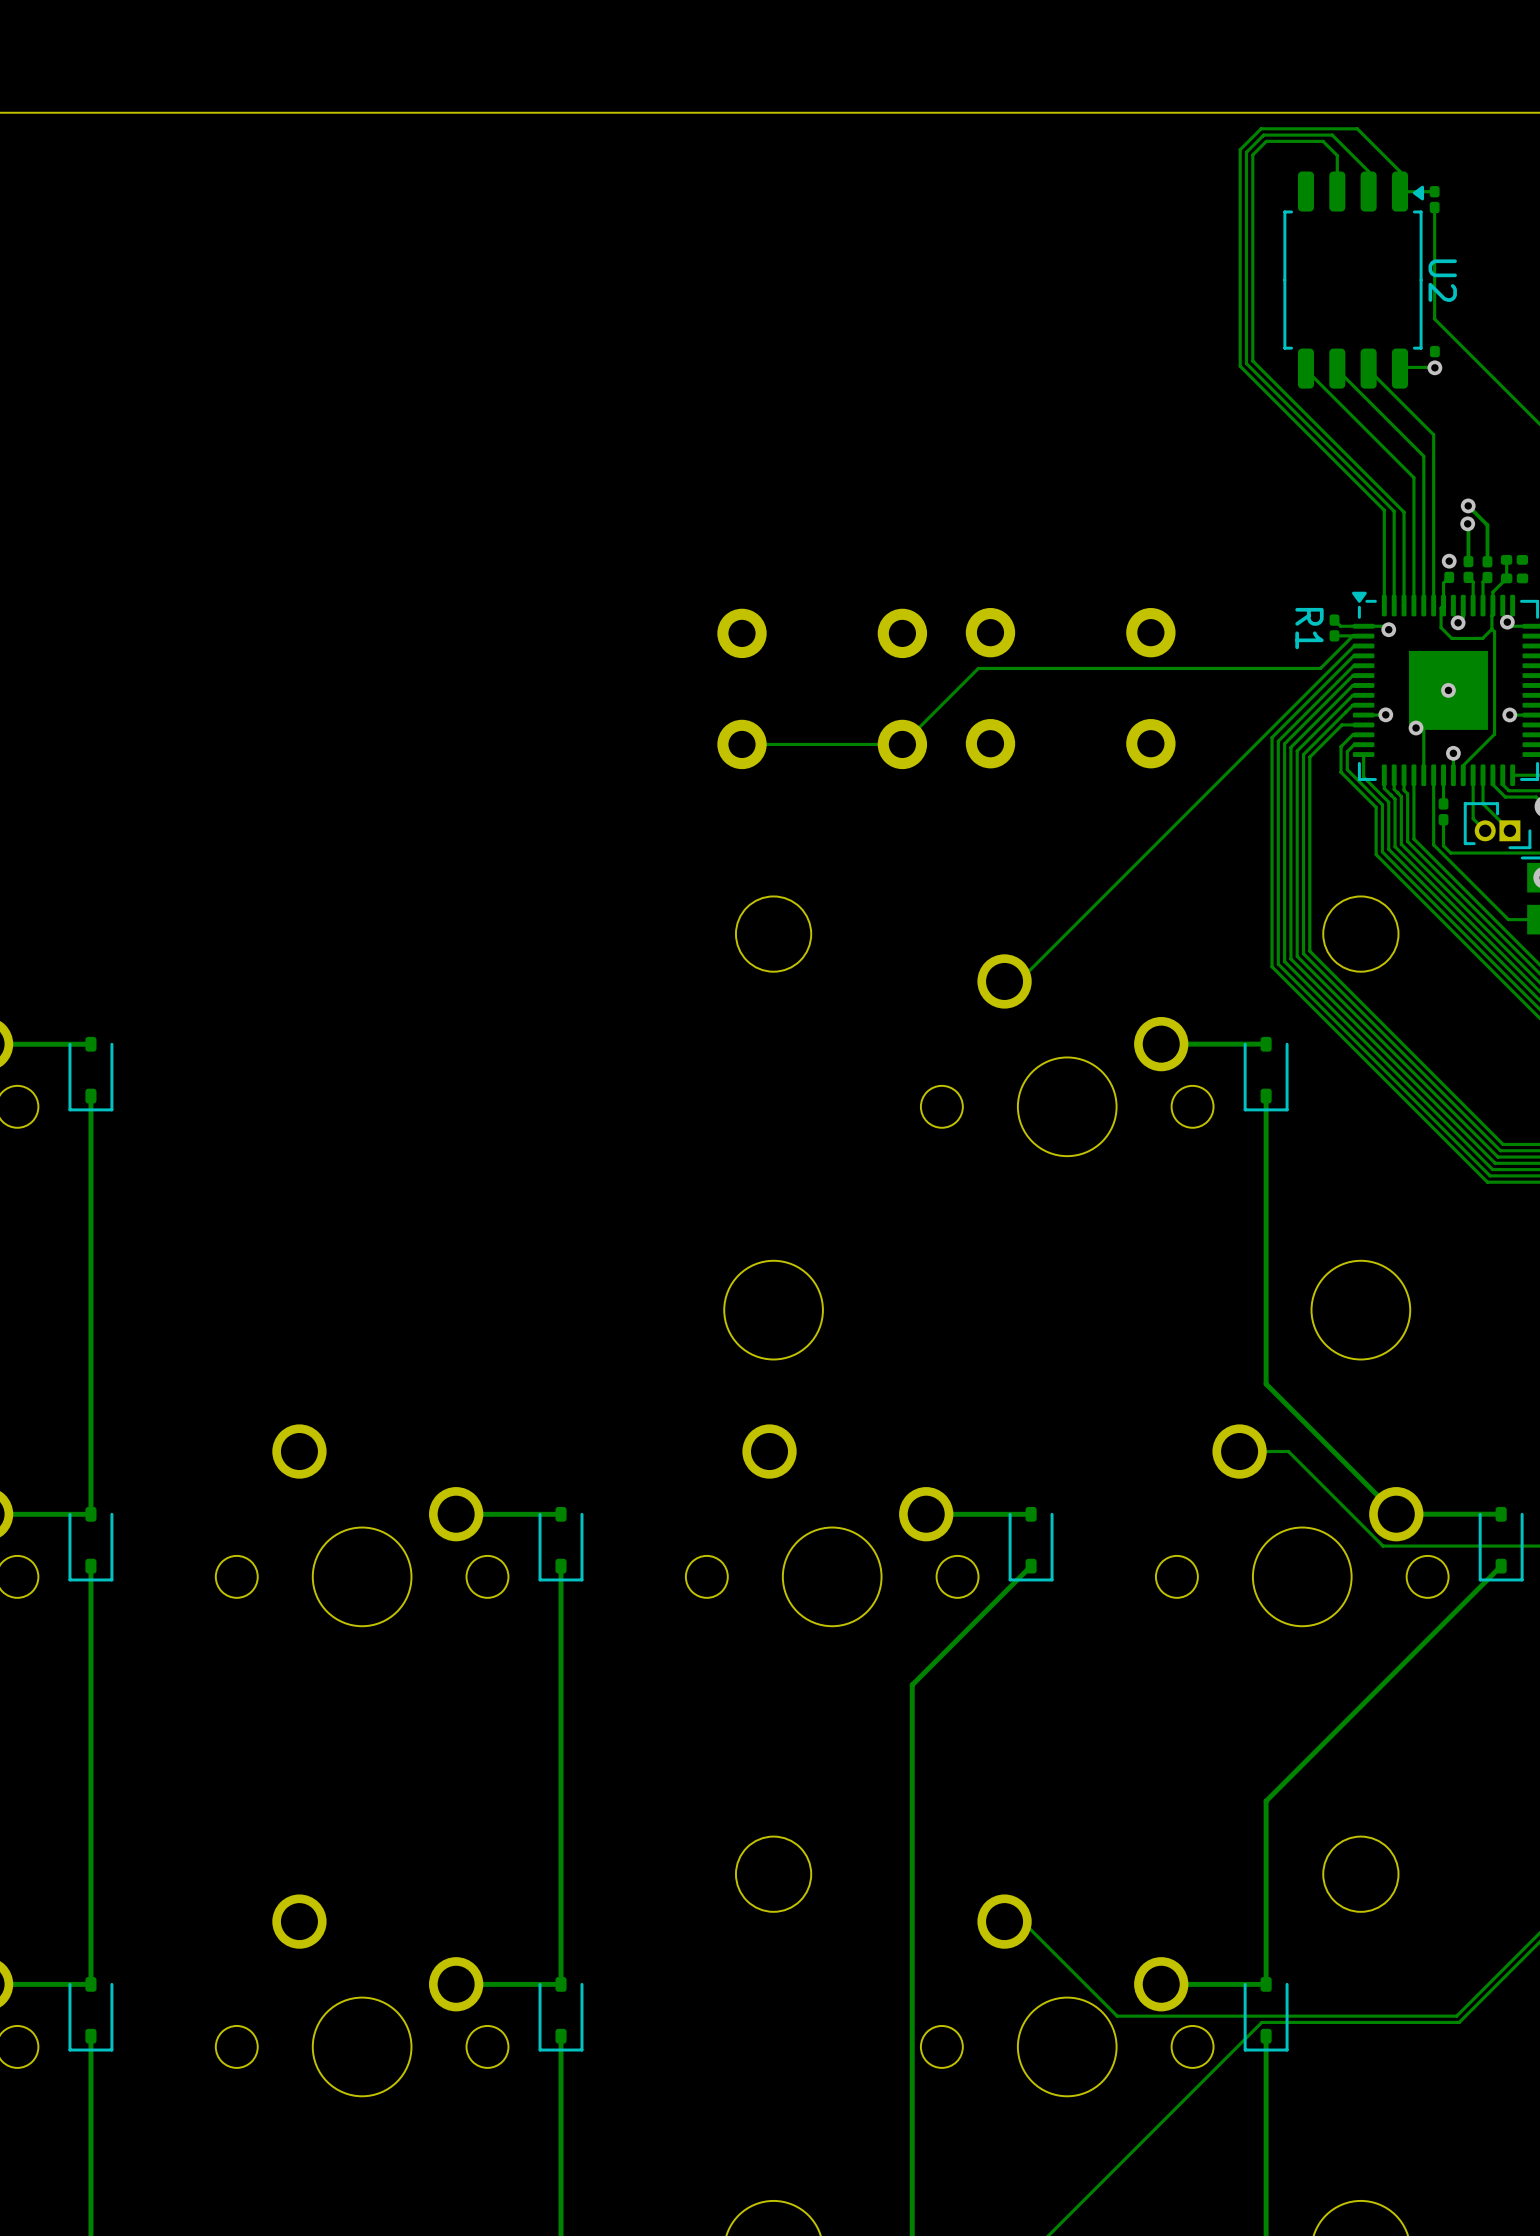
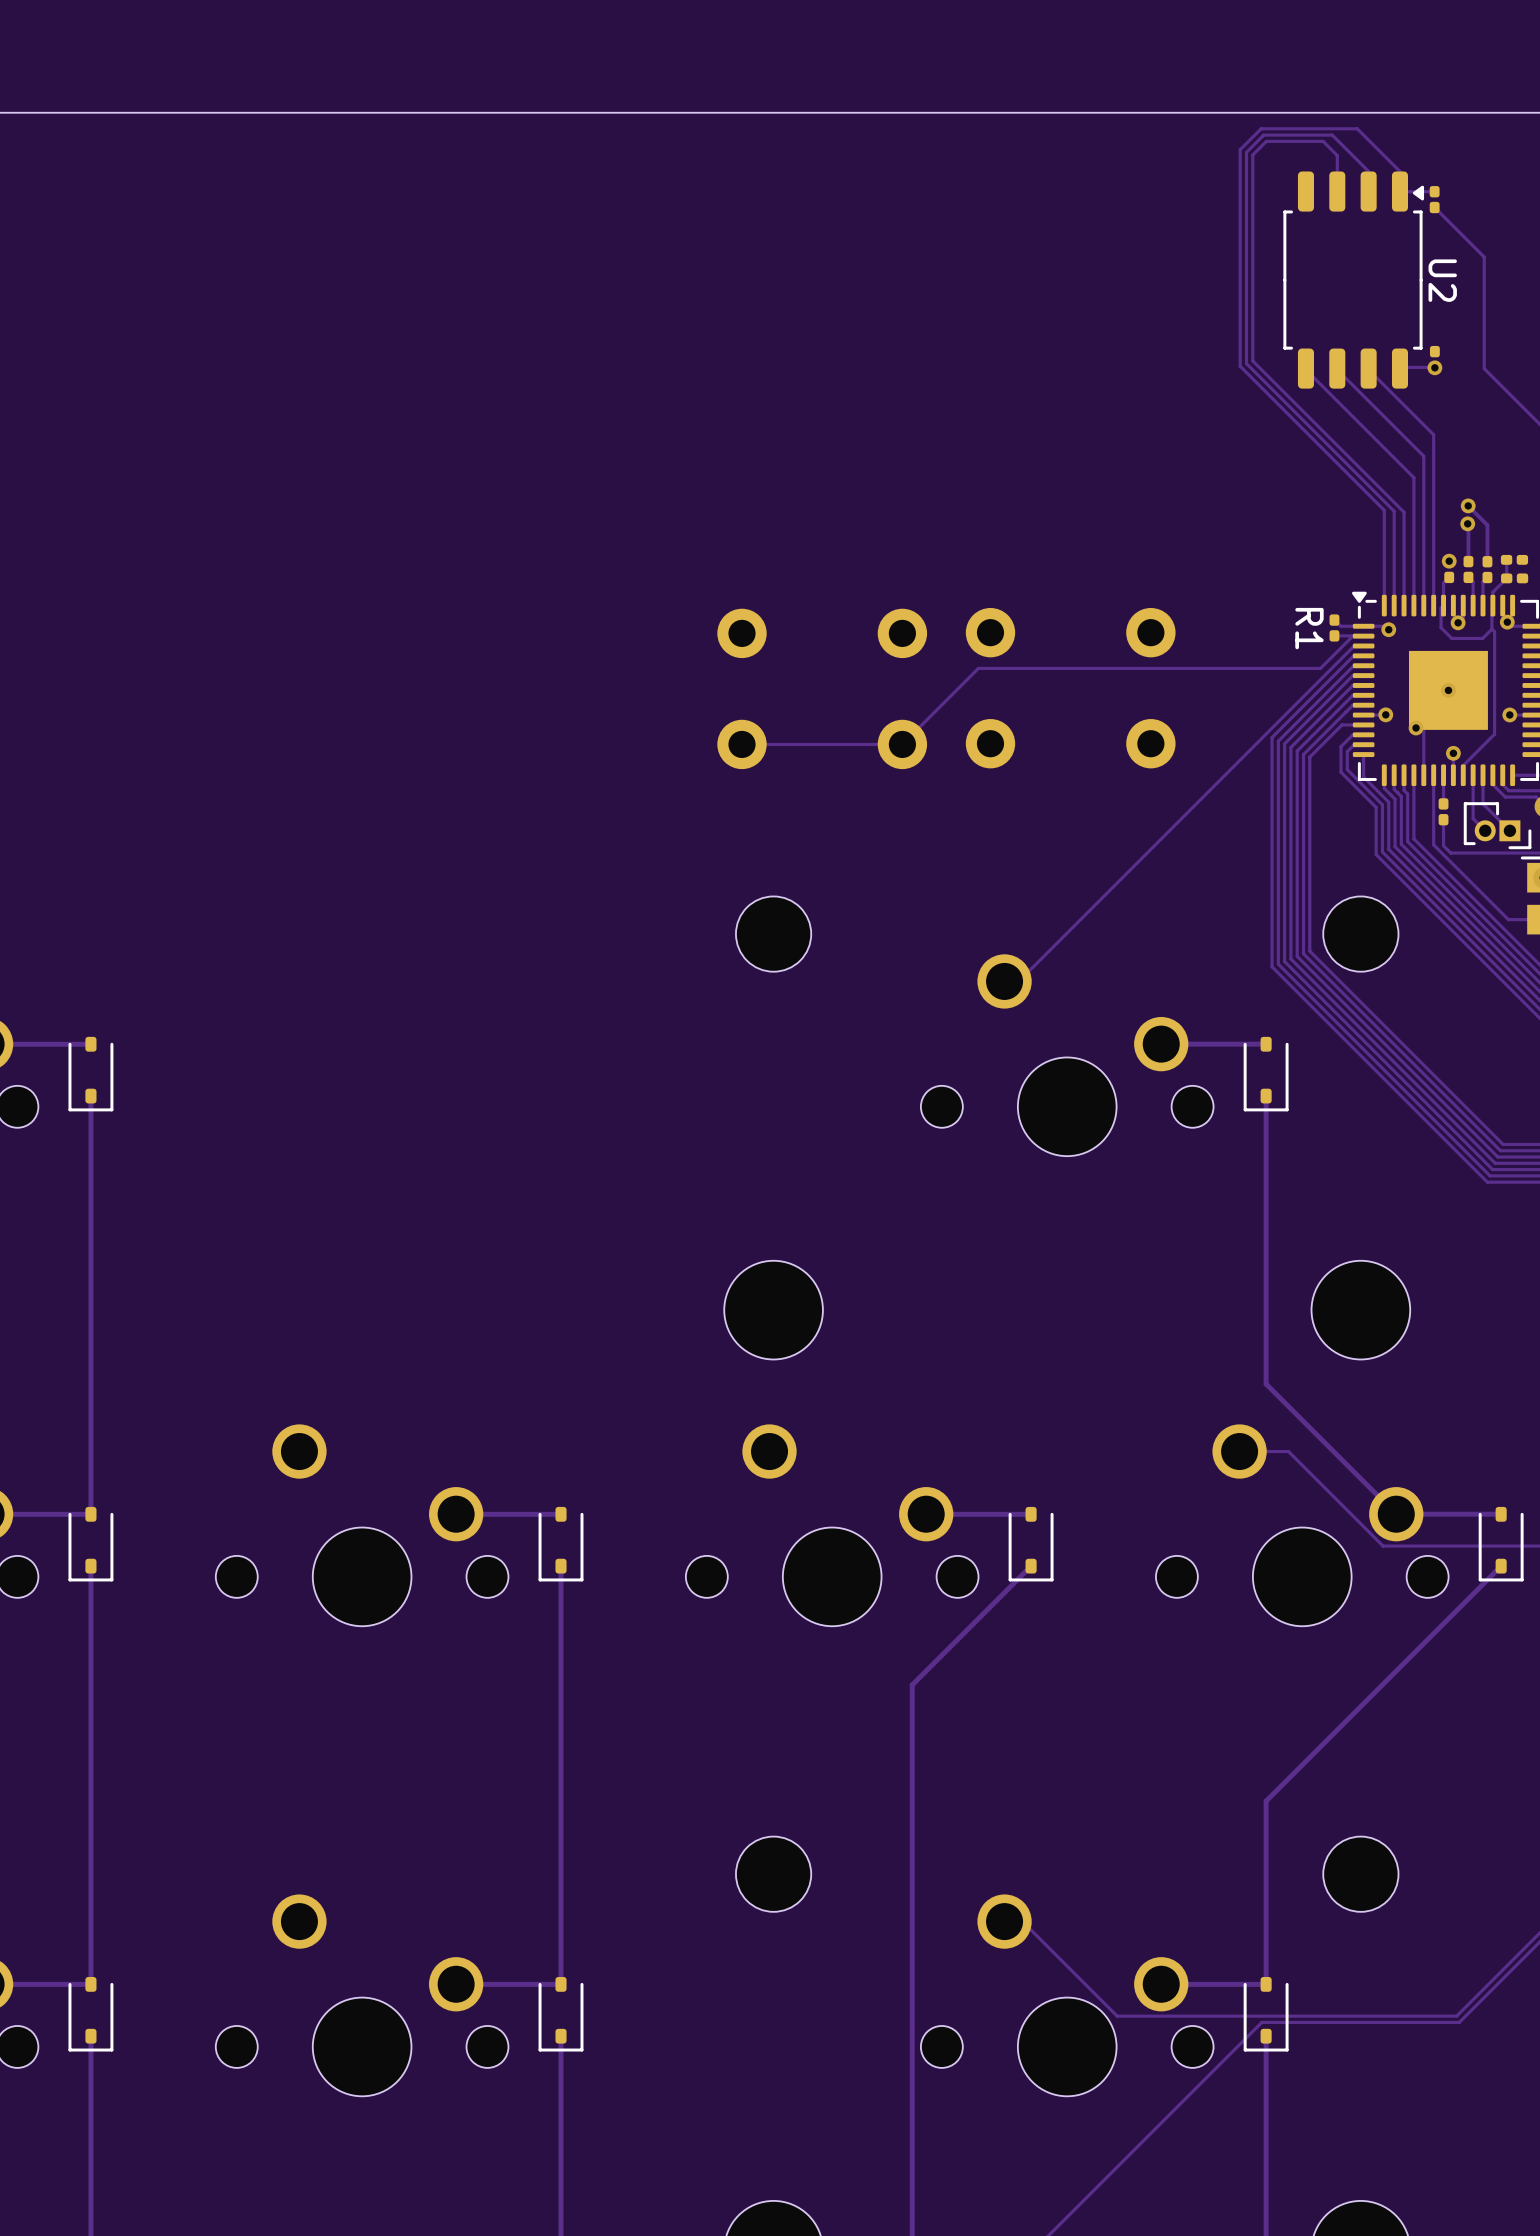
track: (1434, 207) (1434, 319) (1484, 368) -> (1434, 207) (1484, 257) (1484, 368)

